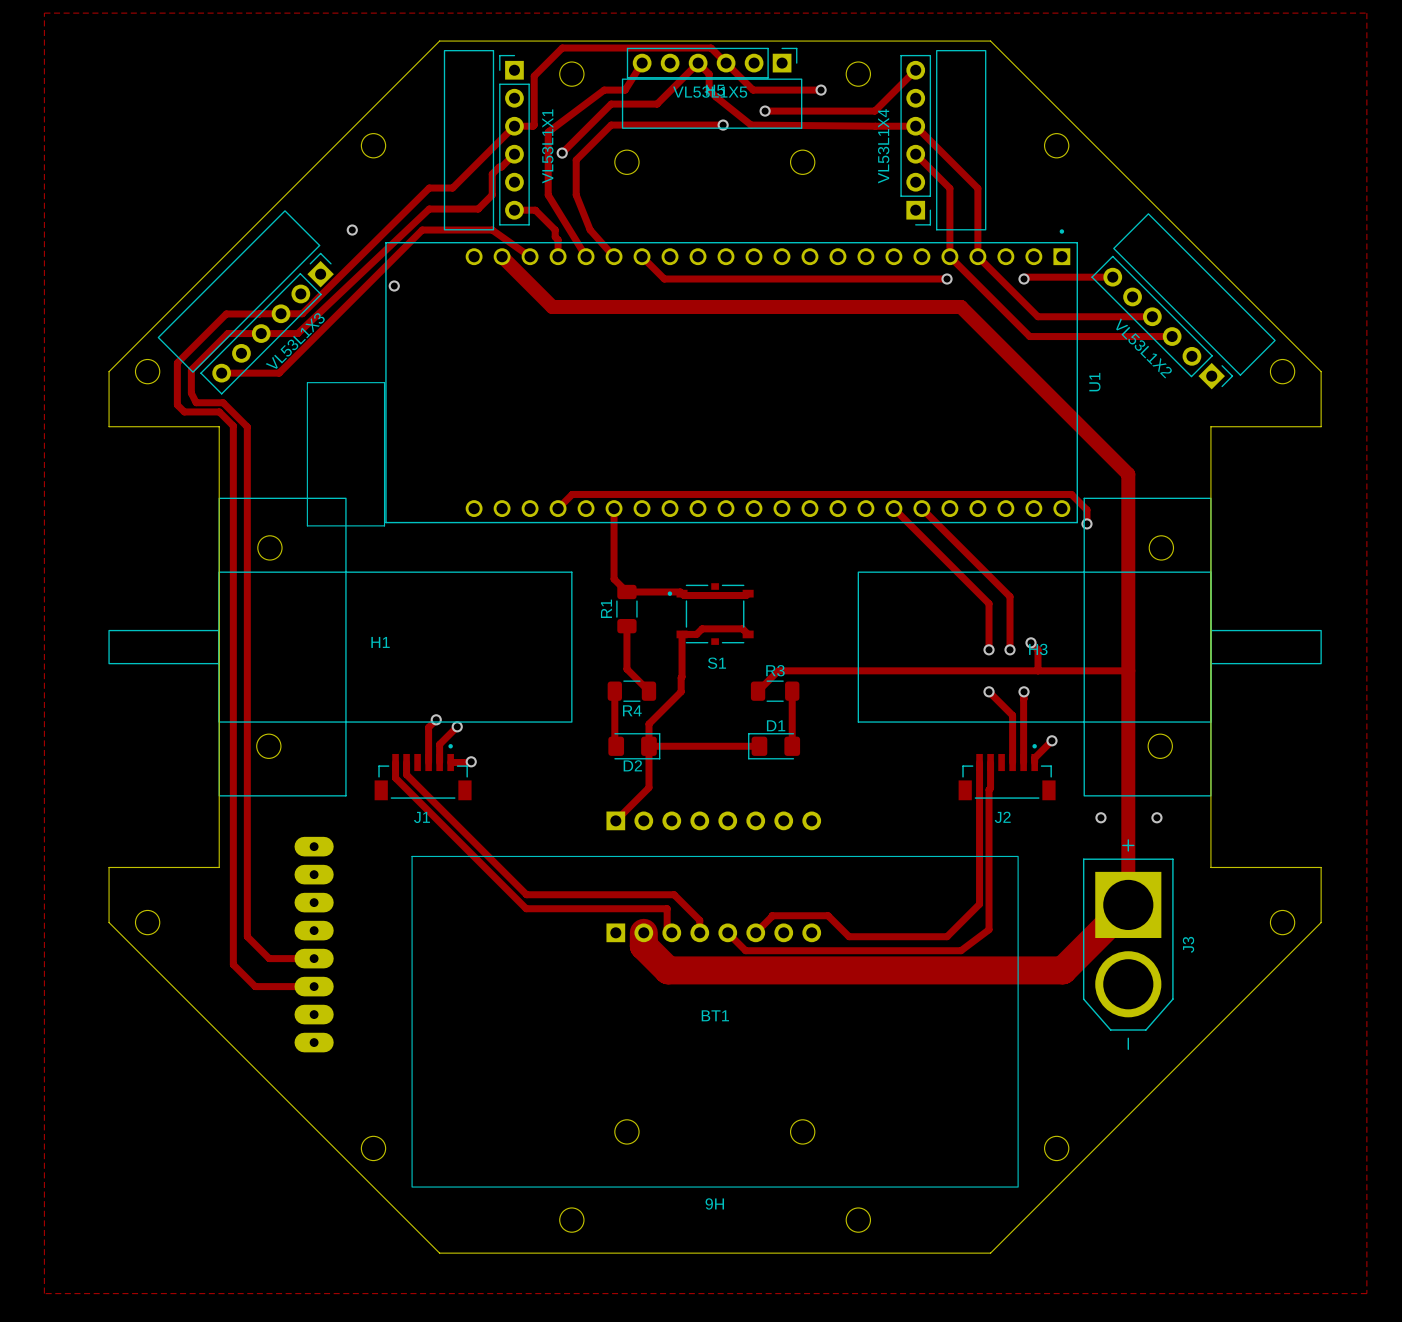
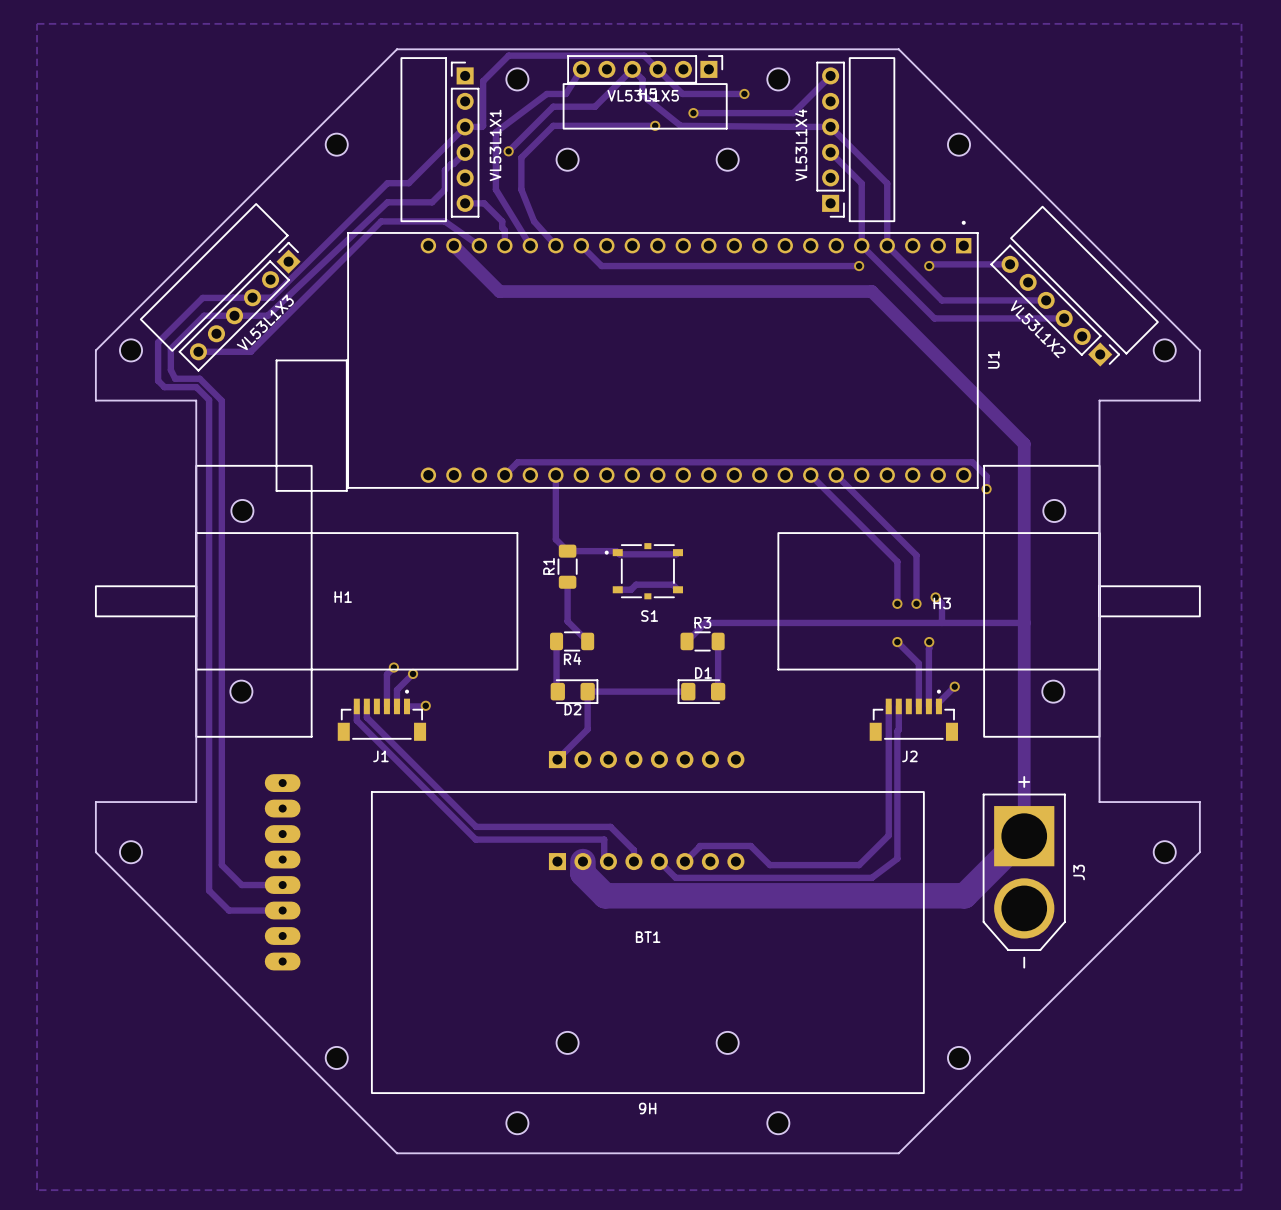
via: (352, 230) -> none
via: (394, 286) -> none
track: (682, 634) (681, 691) (648, 724) (648, 746) -> none
via: (1100, 817) -> none
via: (1156, 817) -> none

